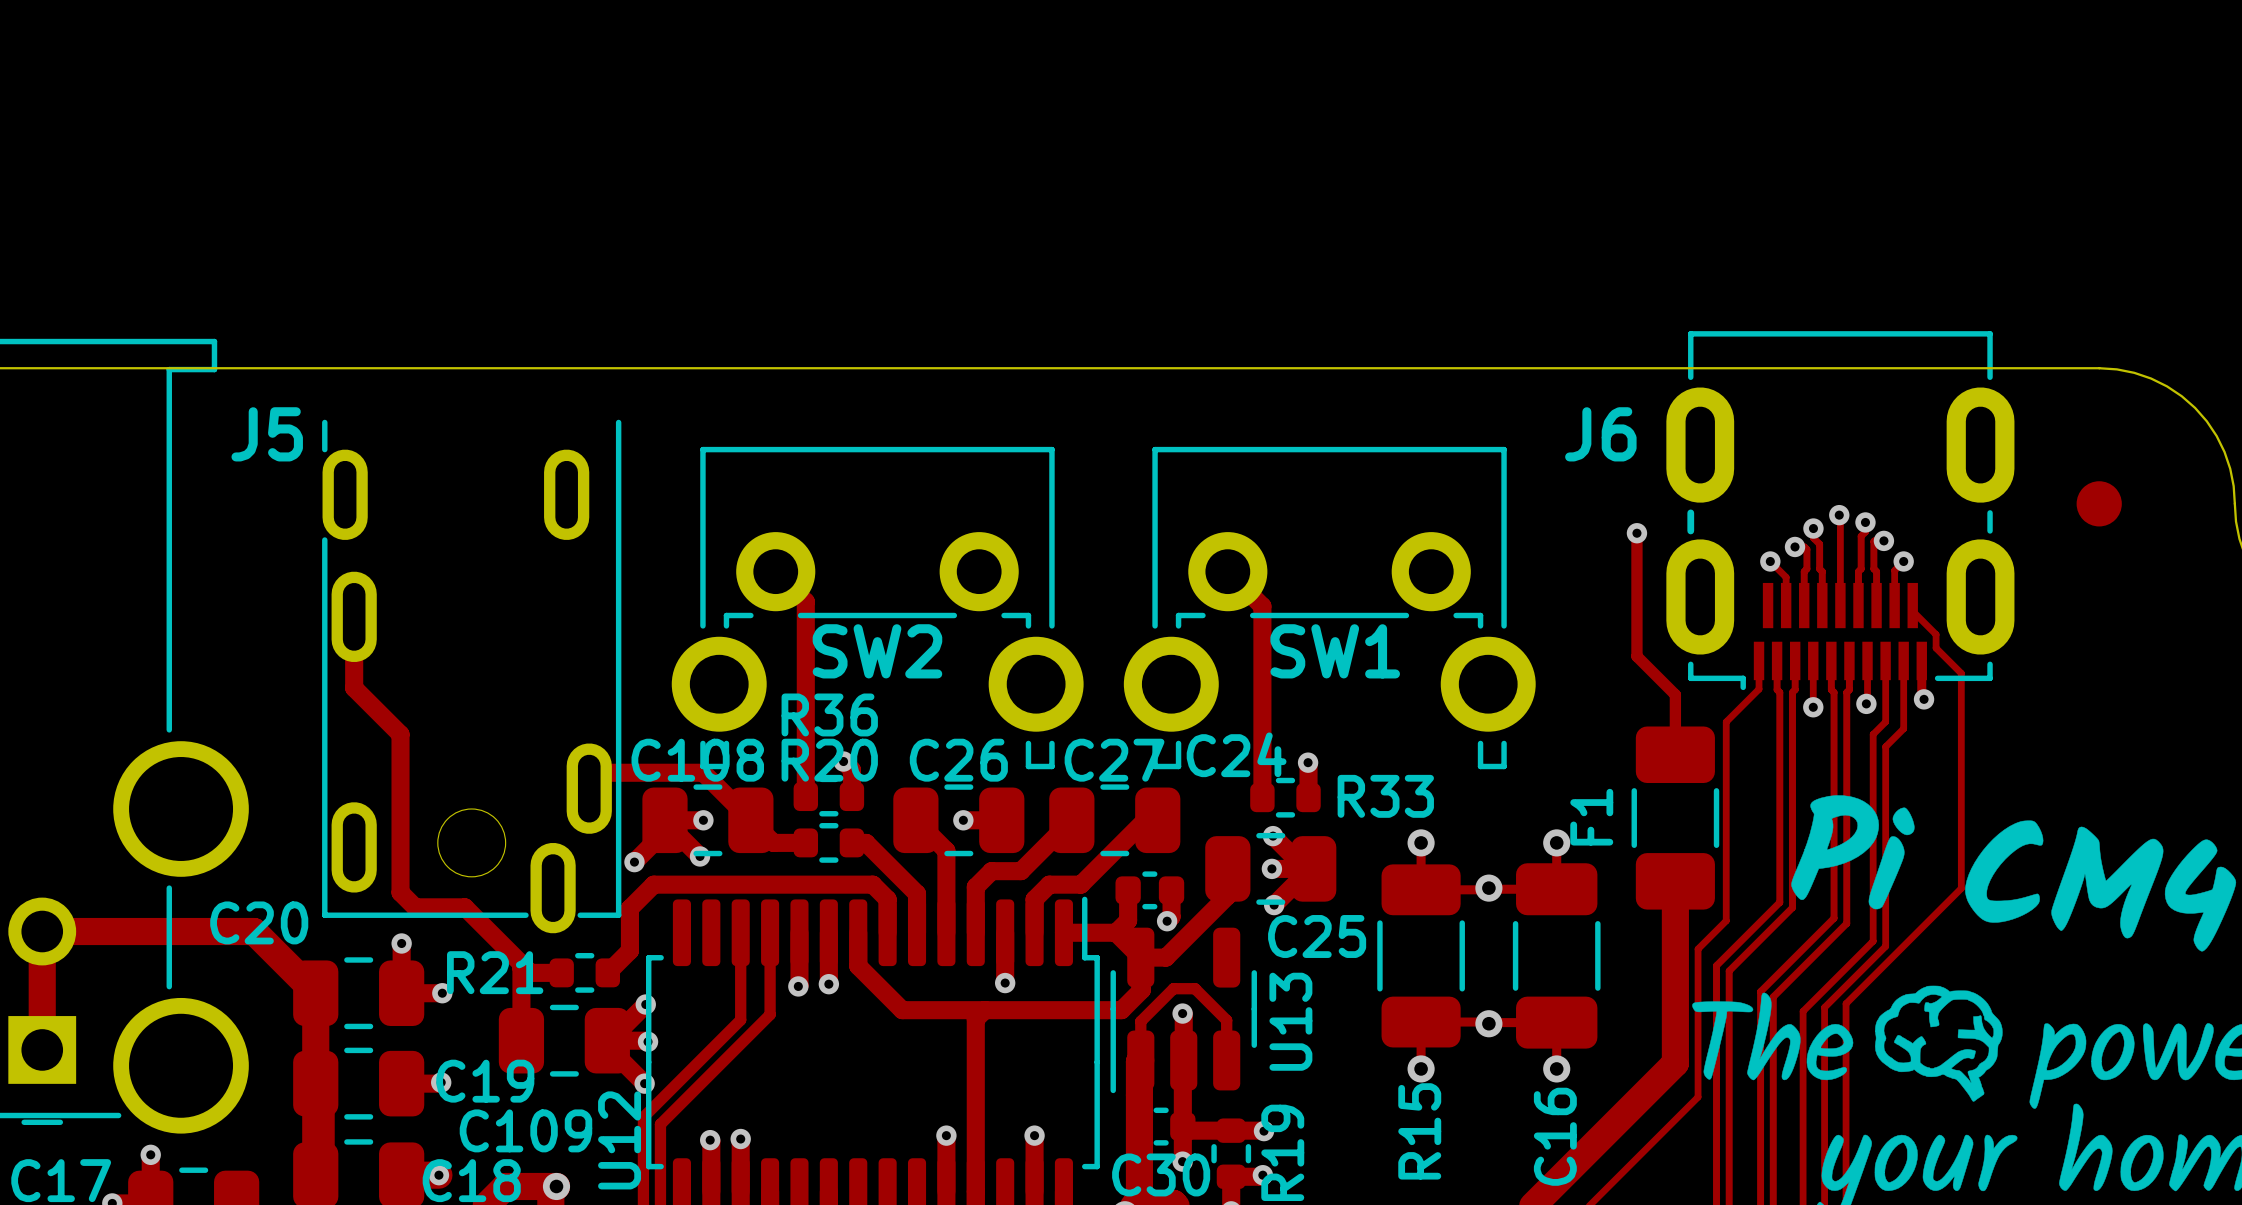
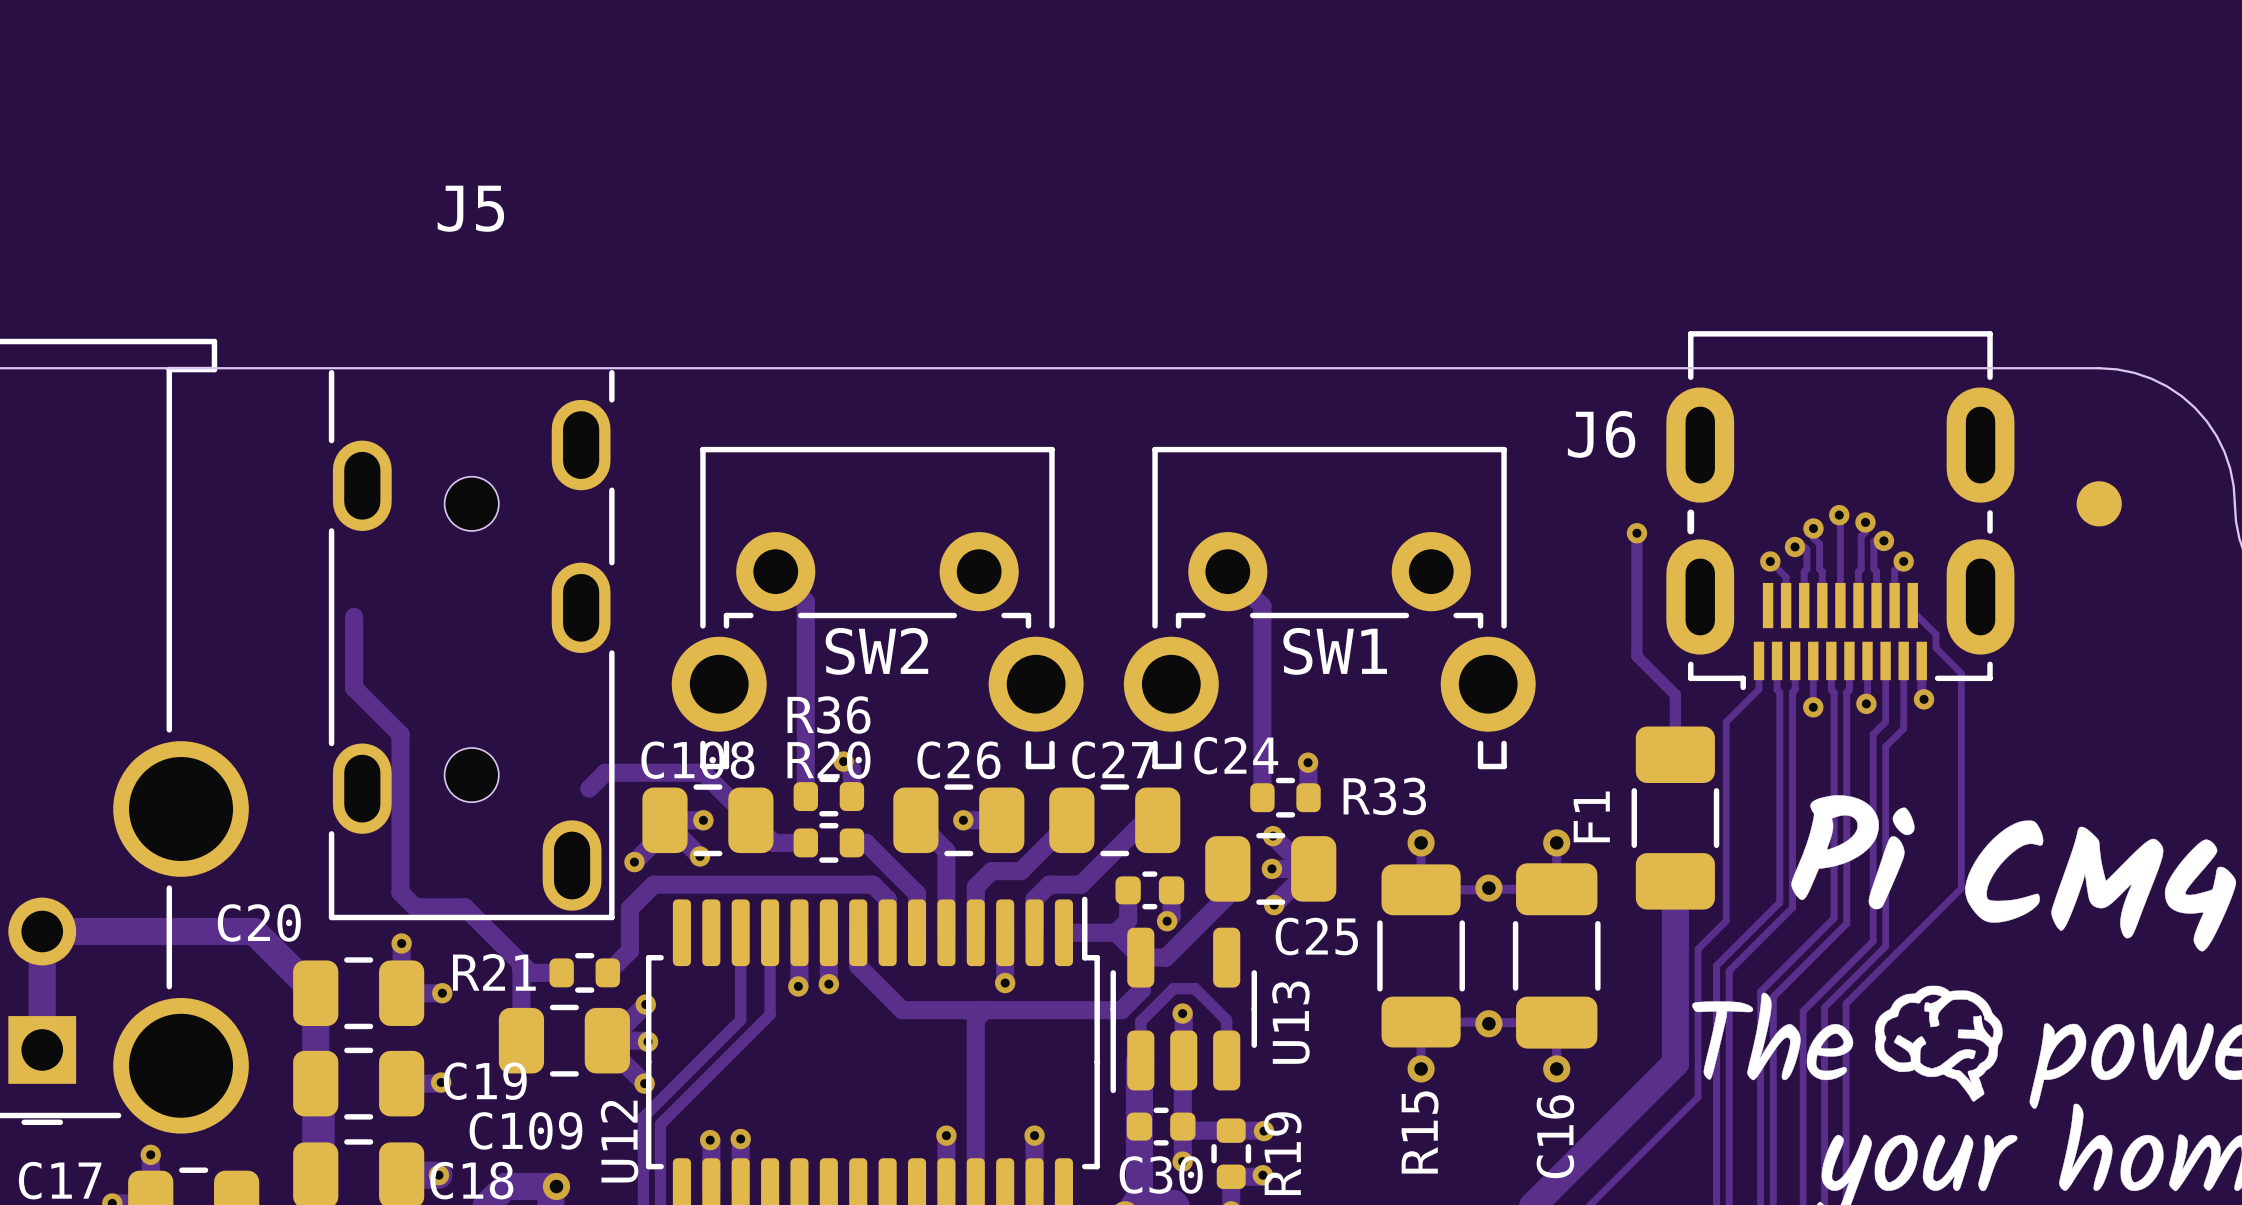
J5 footprint: [322, 419, 622, 934] -> [328, 370, 615, 921]
J5 name position: J5 (267, 434) -> J5 (470, 208)

